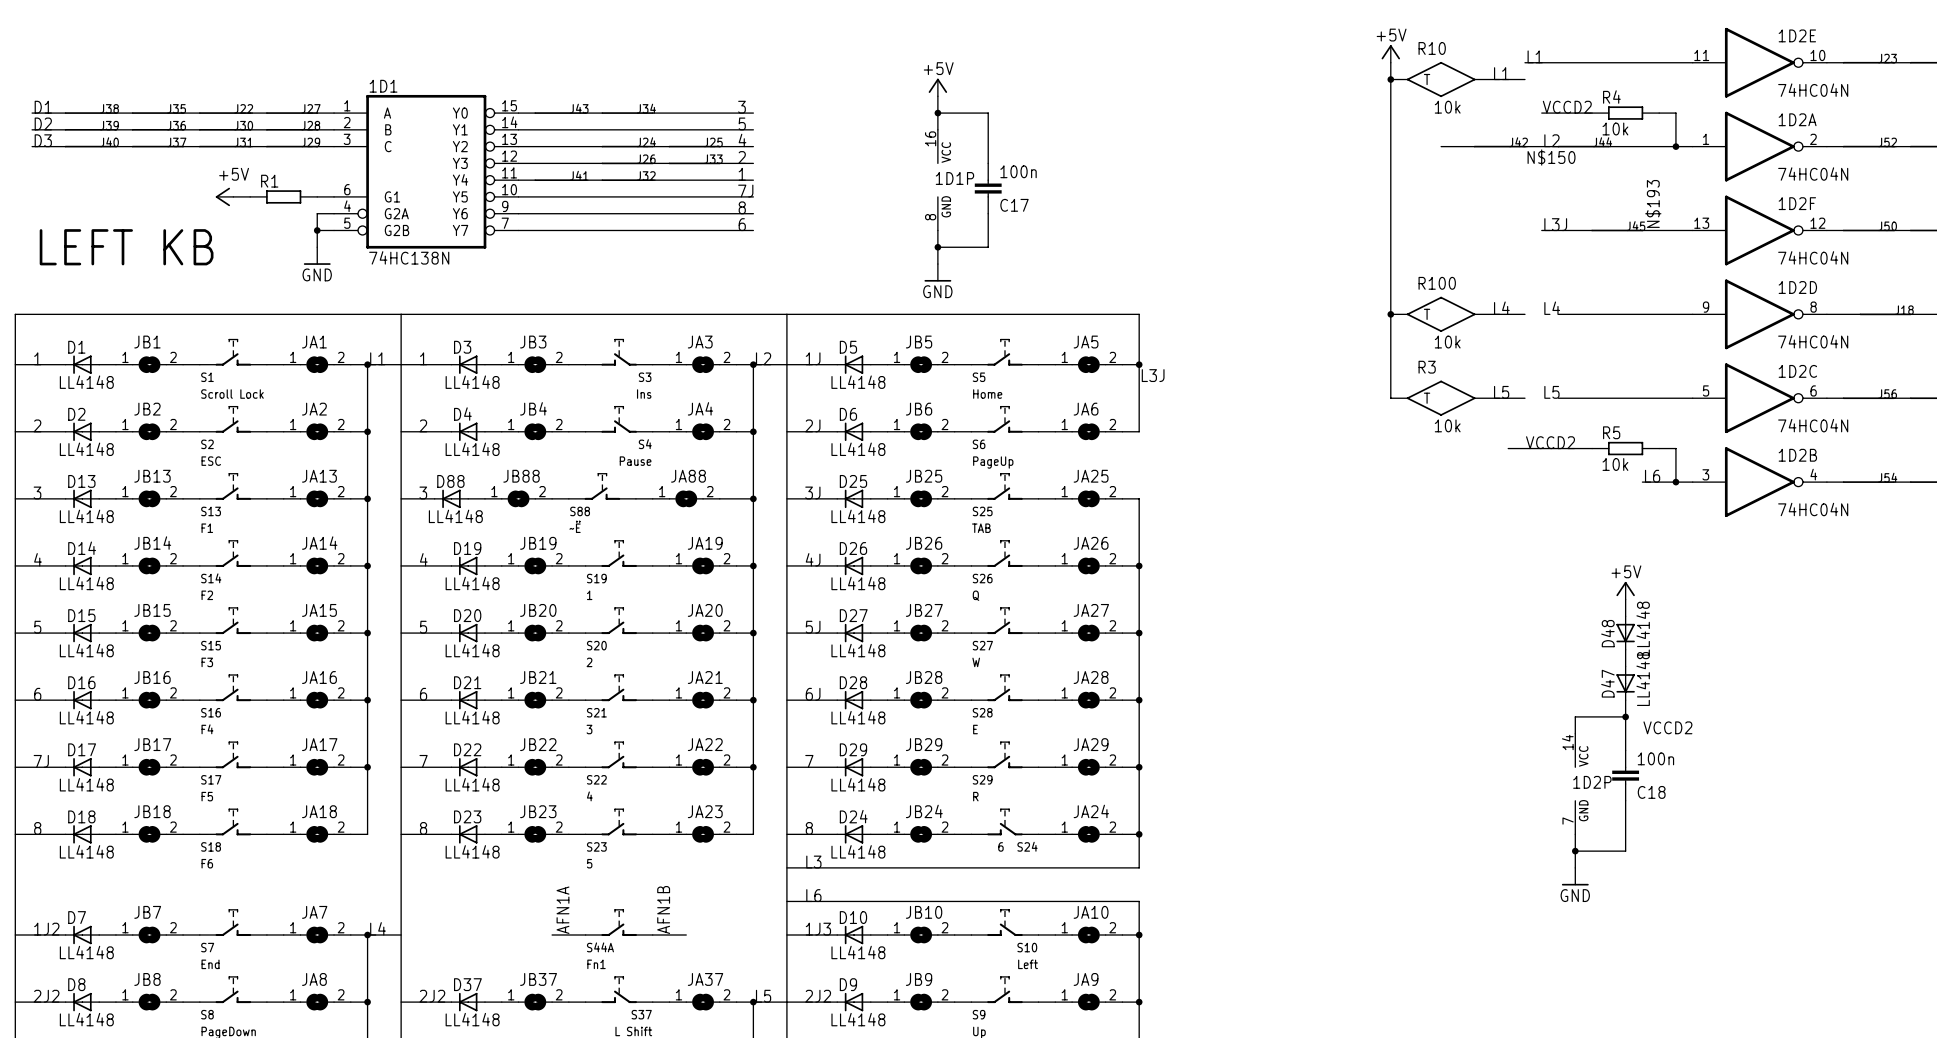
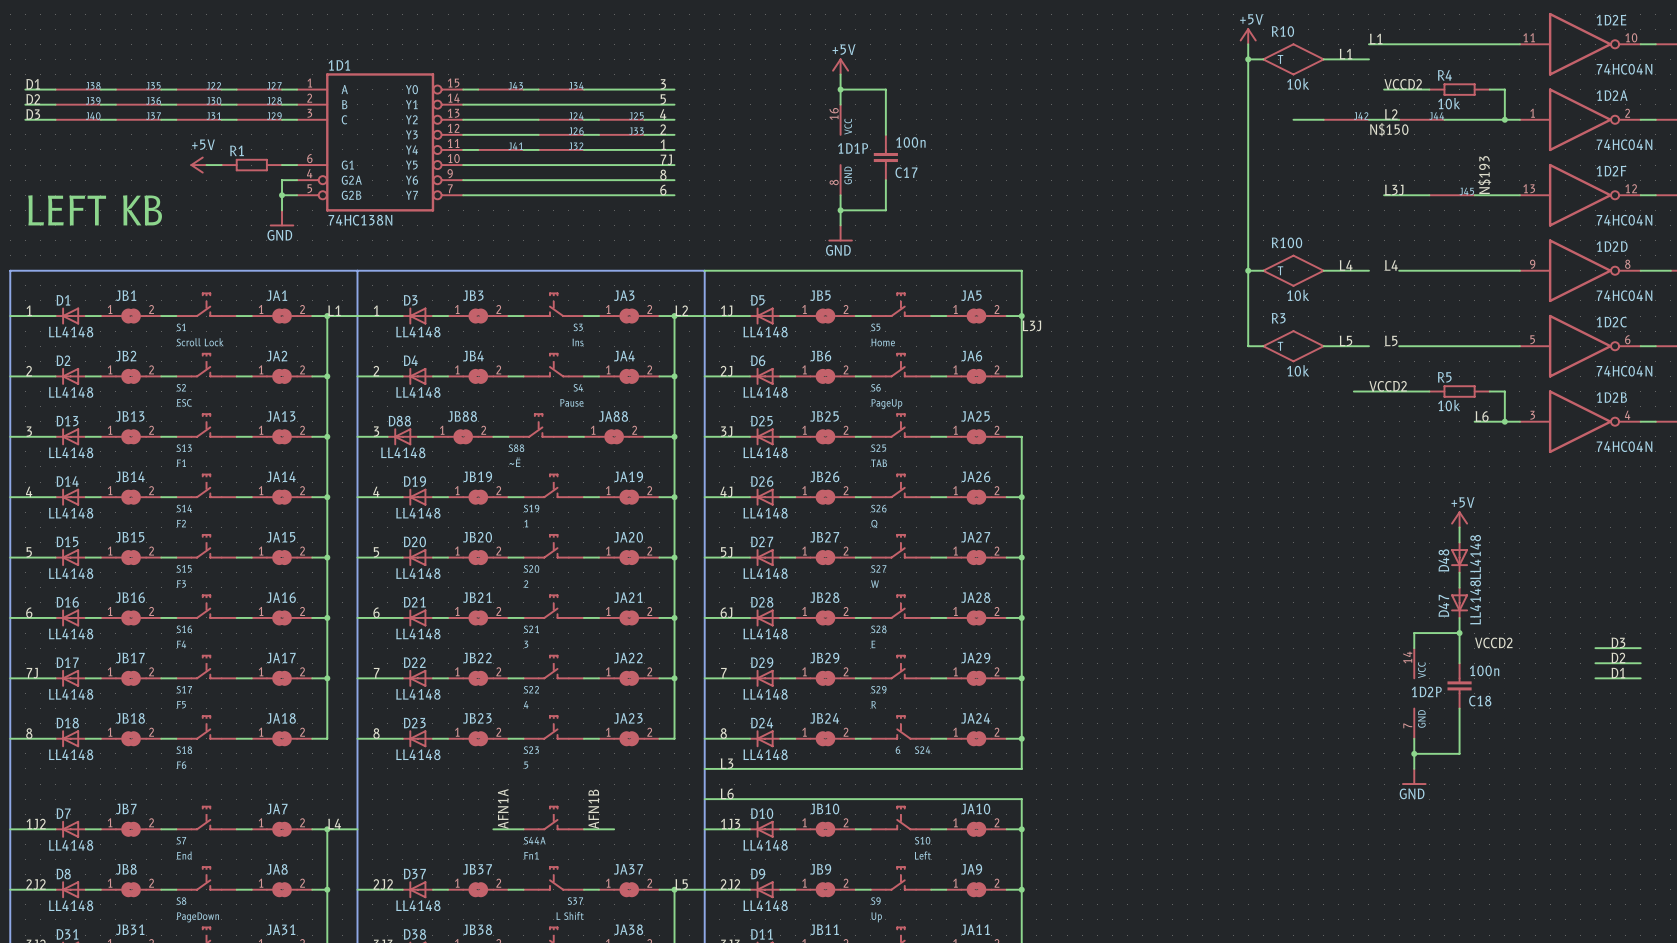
label: none -> D3 (1618, 642)
wire: none -> (1595, 648) (1640, 648)
label: none -> D2 (1618, 657)
wire: none -> (1595, 663) (1640, 663)
label: none -> D1 (1618, 673)
wire: none -> (1595, 678) (1640, 678)

